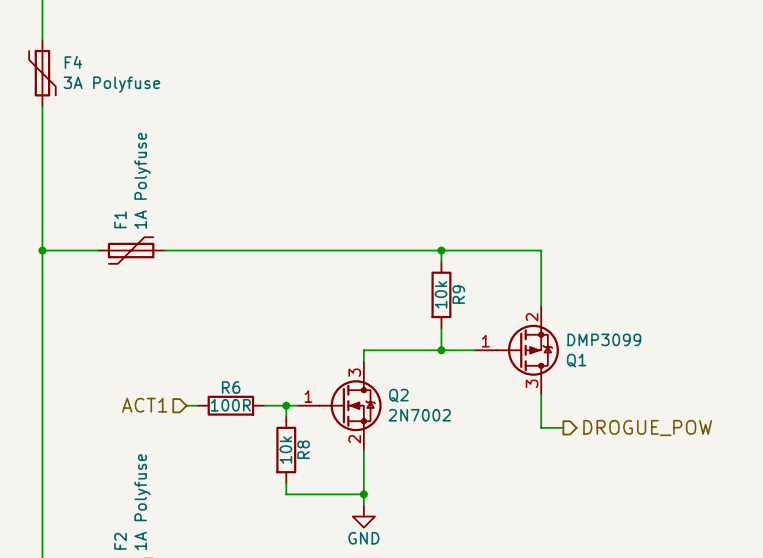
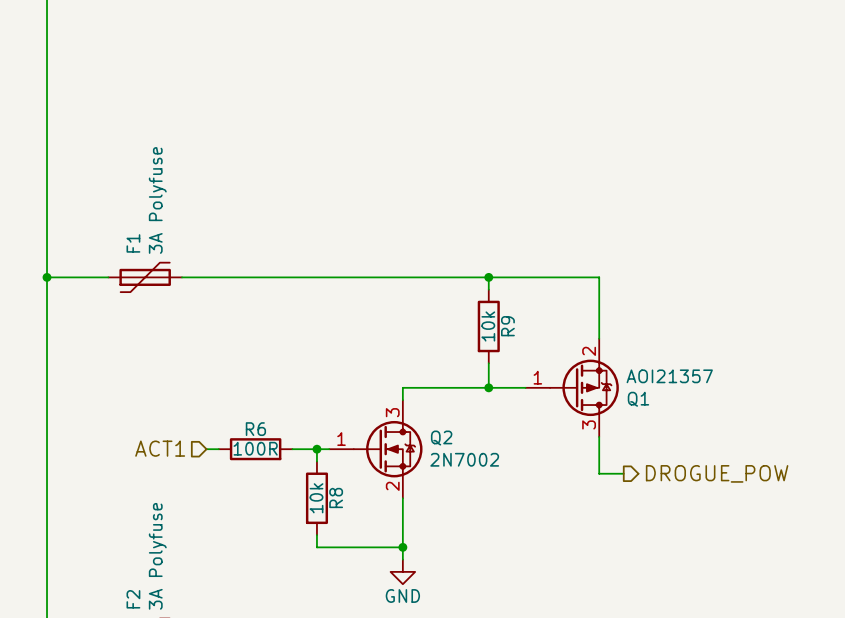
F4: 3A Polyfuse (42, 73) -> none
F1 value: 1A Polyfuse (142, 180) -> 3A Polyfuse (157, 200)
Q1 value: DMP3099 (604, 339) -> AOI21357 (669, 376)
F2 value: 1A Polyfuse (142, 502) -> 3A Polyfuse (157, 556)

